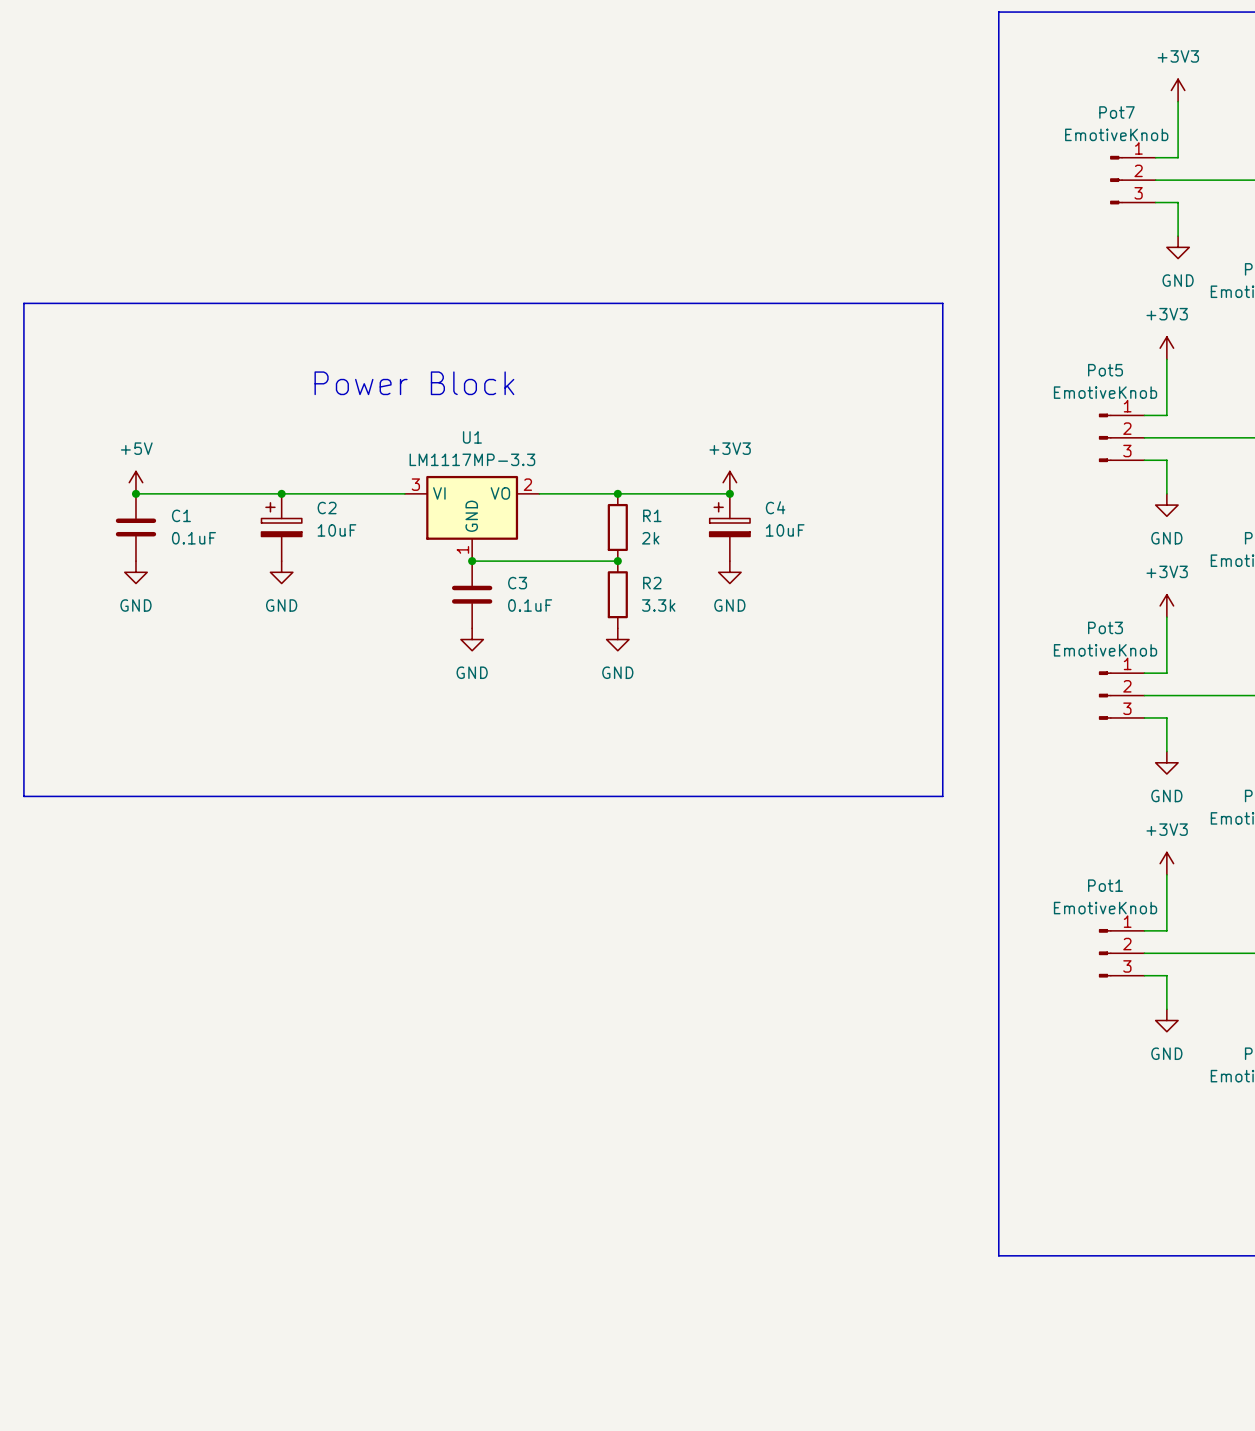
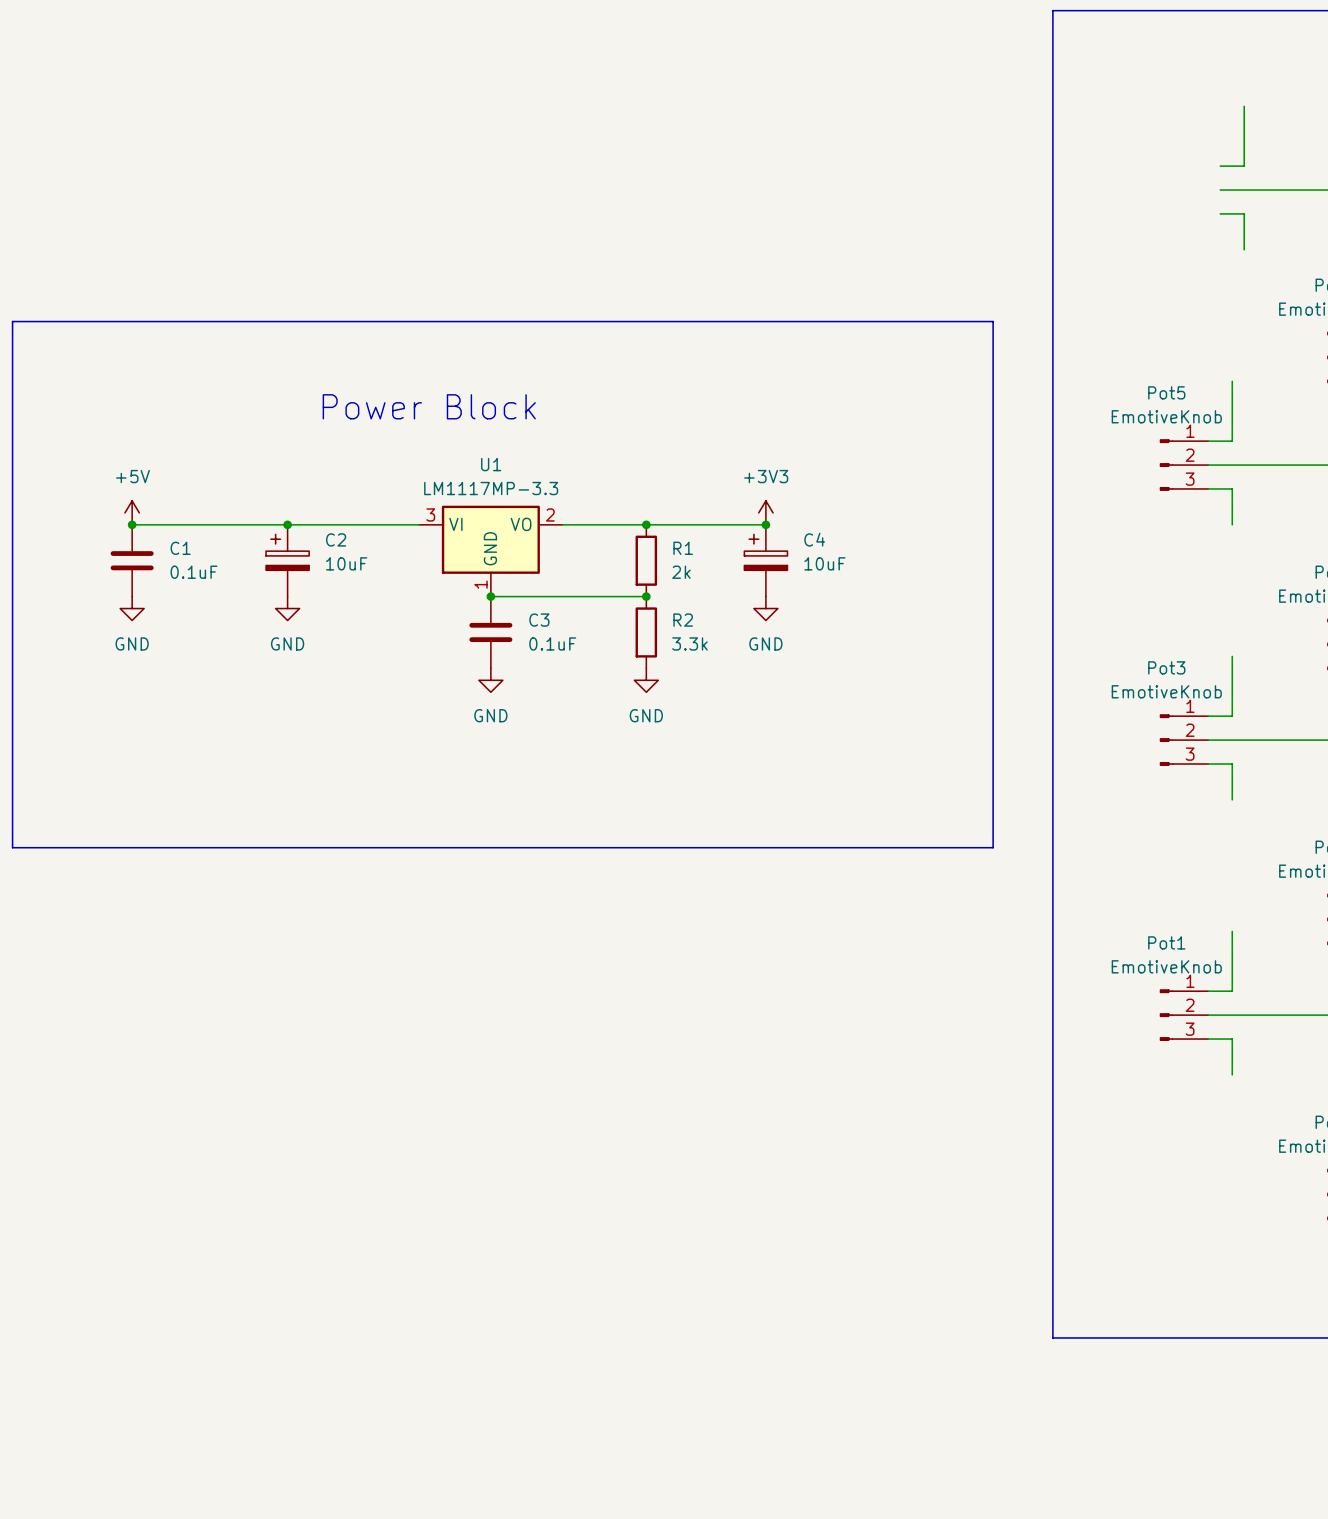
power symbol: +3V3 (1178, 90) -> none
Pot7: EmotiveKnob (1132, 180) -> none
power symbol: GND (1178, 247) -> none
power symbol: +3V3 (1166, 348) -> none
power symbol: GND (1166, 505) -> none
power symbol: +3V3 (1166, 605) -> none
power symbol: GND (1166, 762) -> none
power symbol: +3V3 (1166, 863) -> none
power symbol: GND (1166, 1020) -> none

